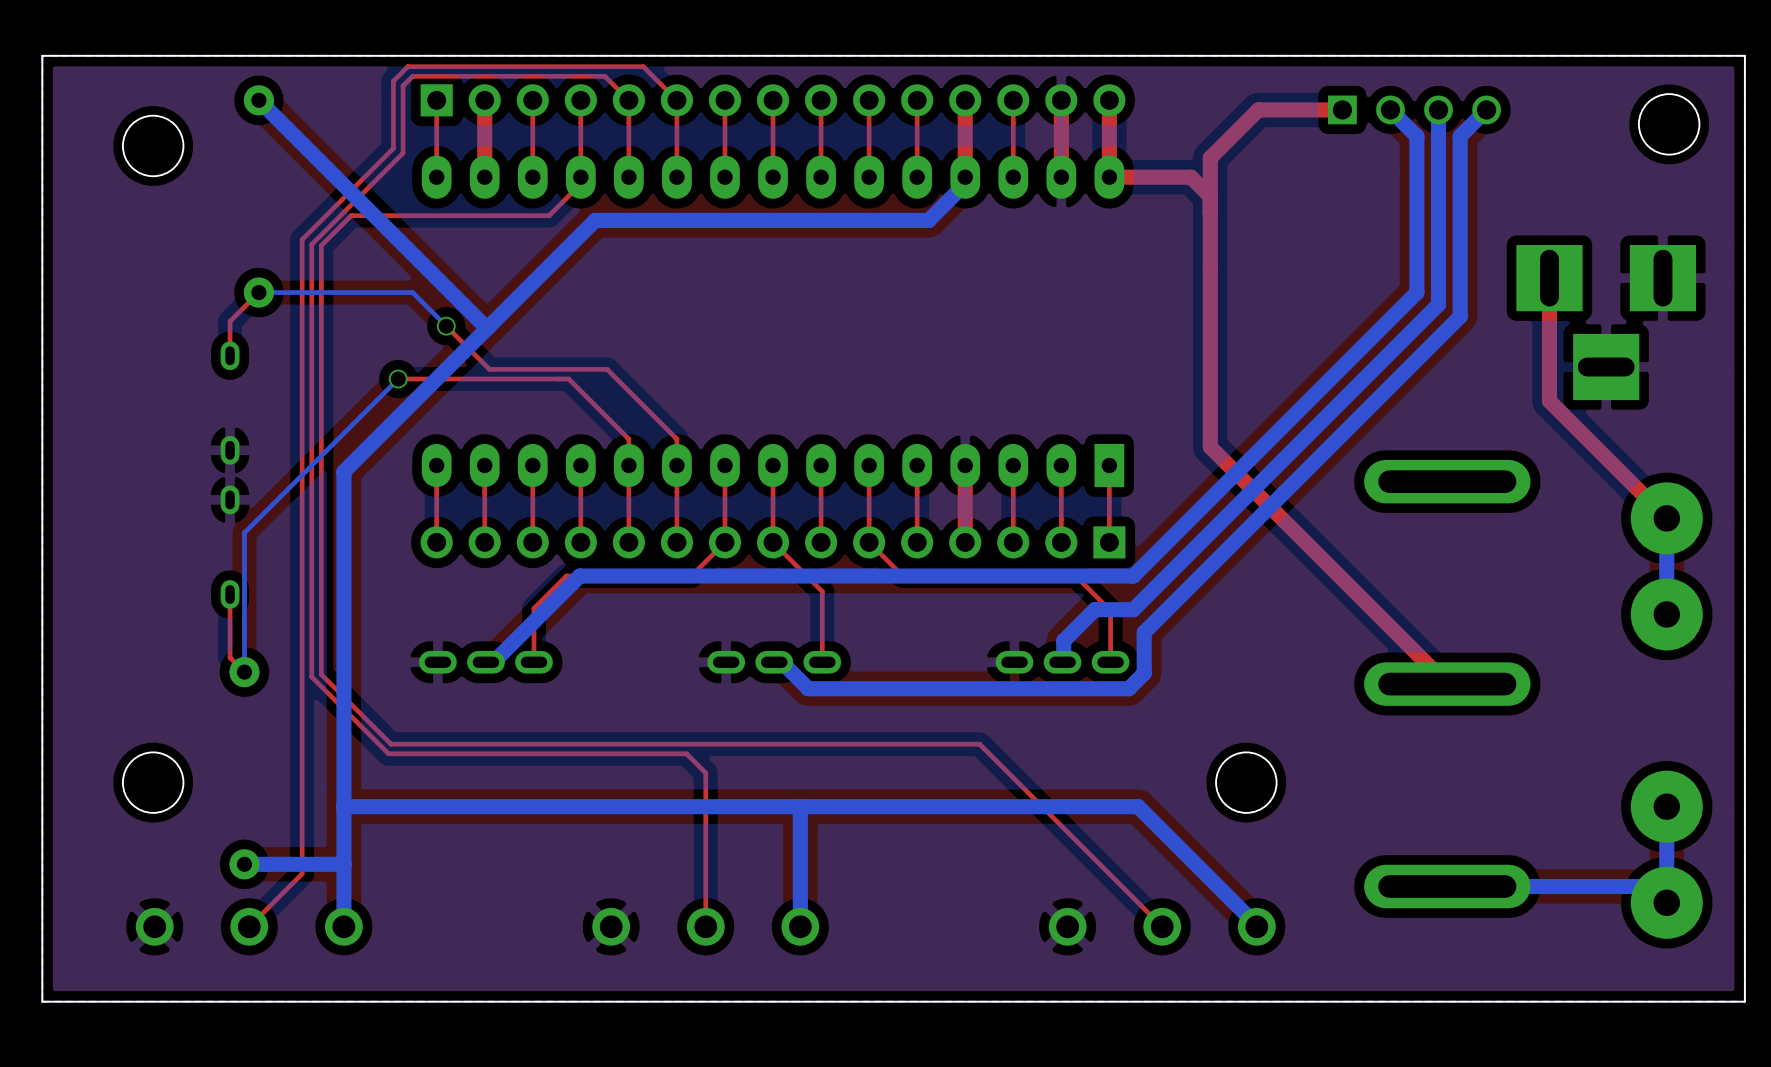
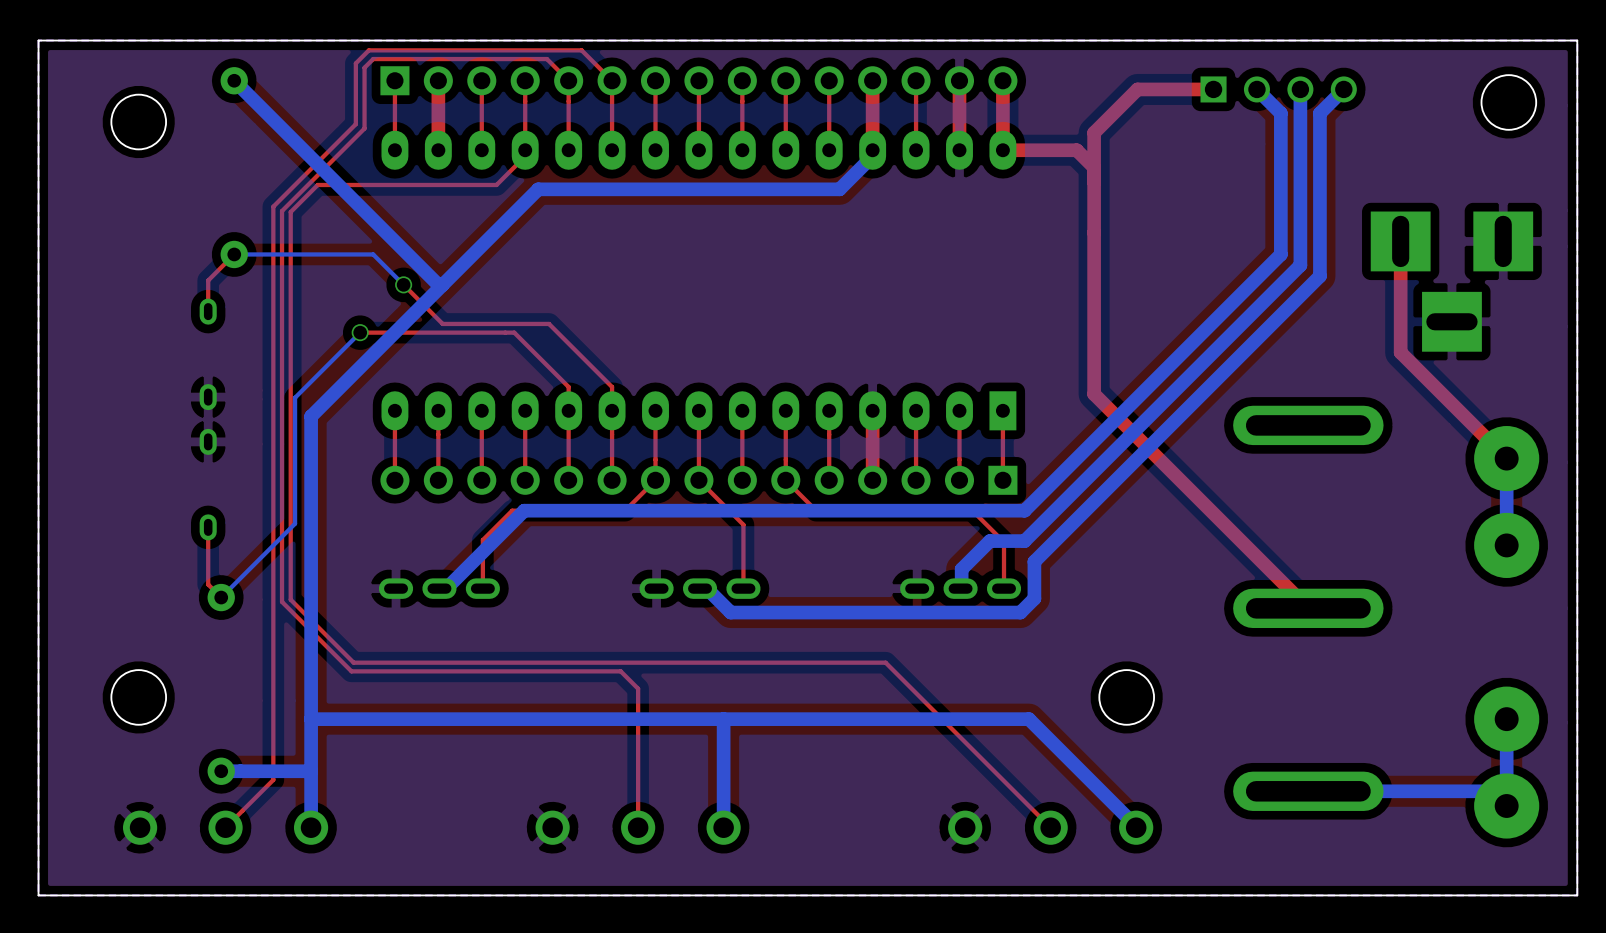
bottom track: (326, 451) (244, 532) (244, 672) -> (295, 397) (295, 523) (221, 597)

